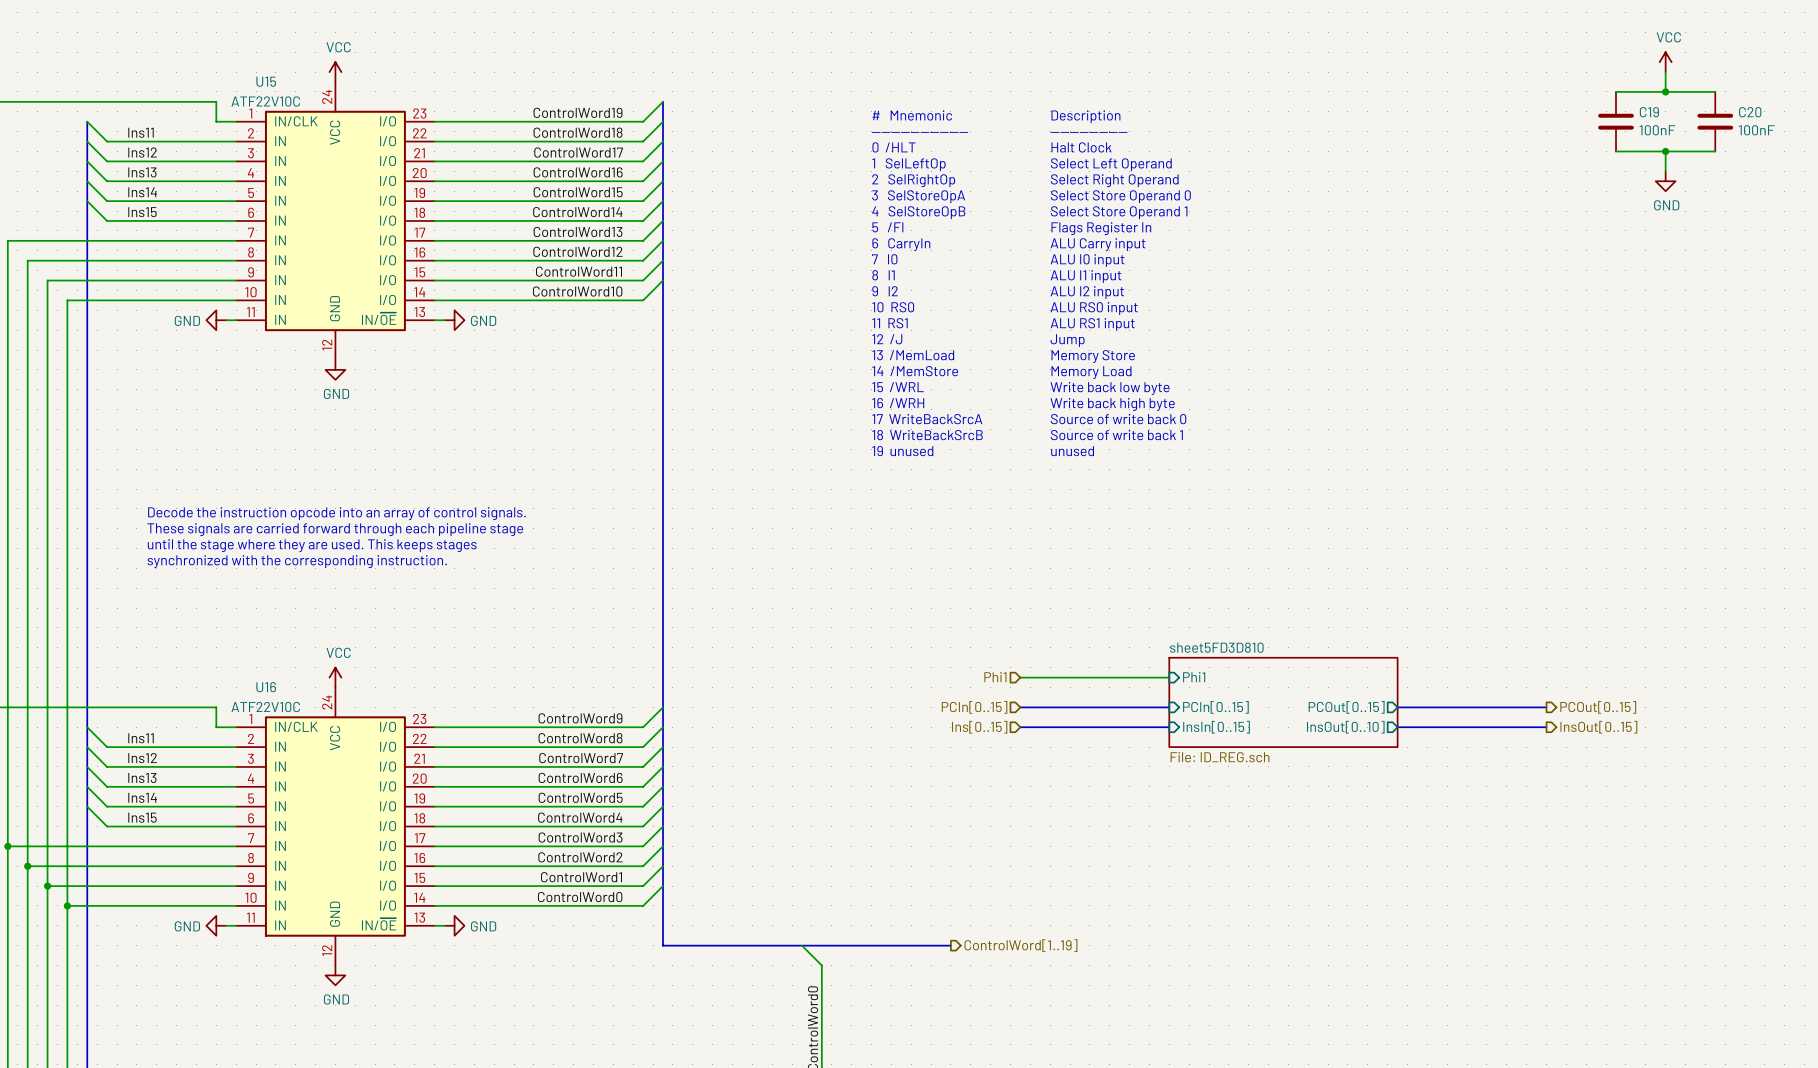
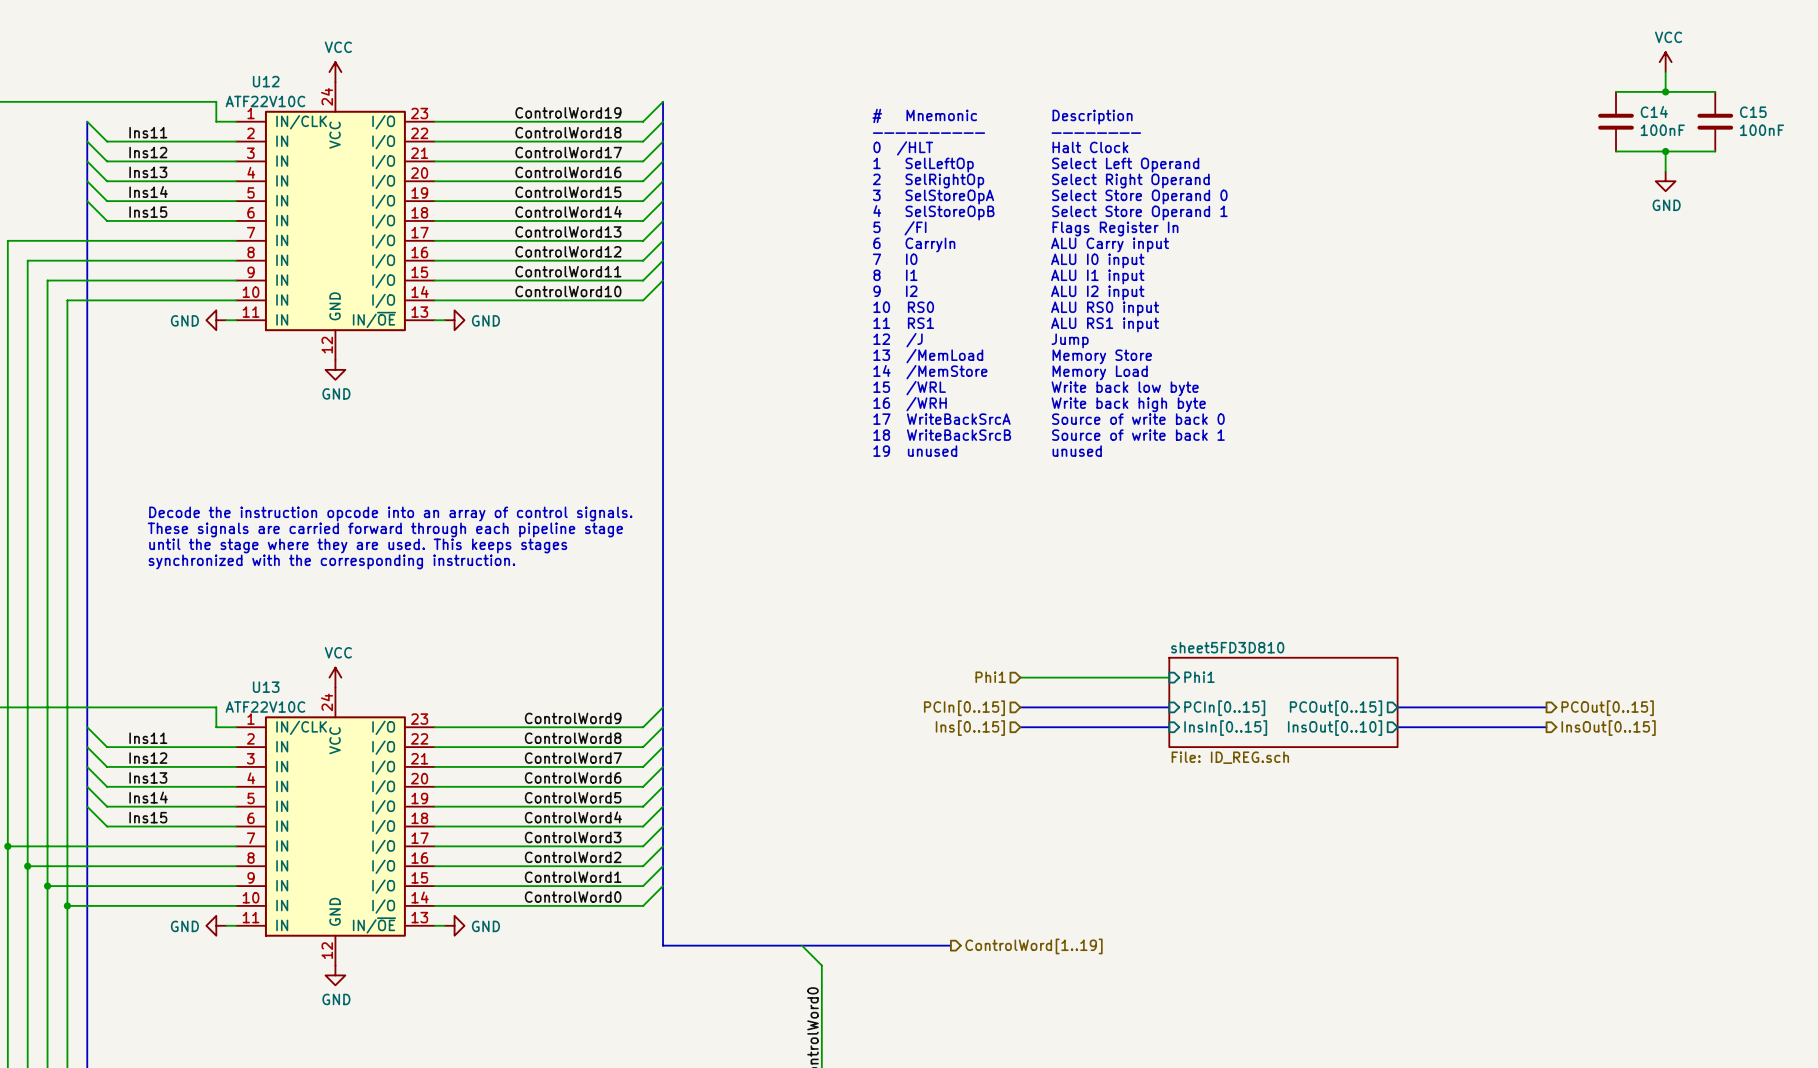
U15 name: U15 (266, 81) -> U12 (266, 81)
C19 name: C19 (1649, 112) -> C14 (1654, 111)
C20 name: C20 (1750, 112) -> C15 (1753, 112)
U16 name: U16 (266, 687) -> U13 (266, 687)

